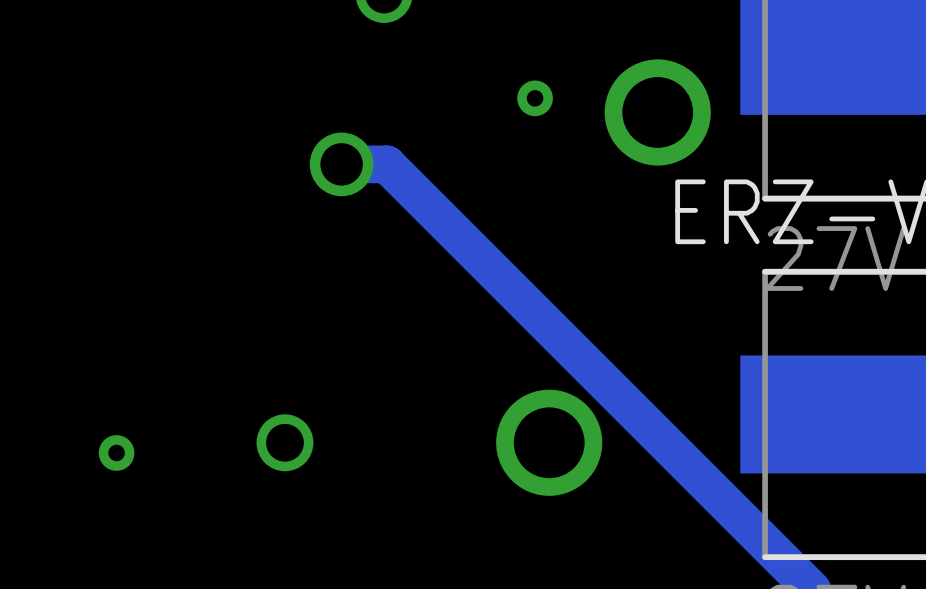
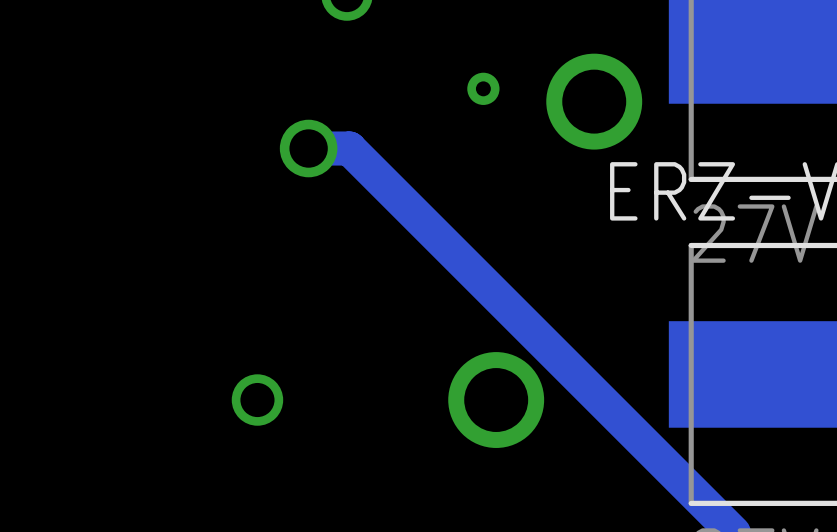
via: (116, 452) -> none

